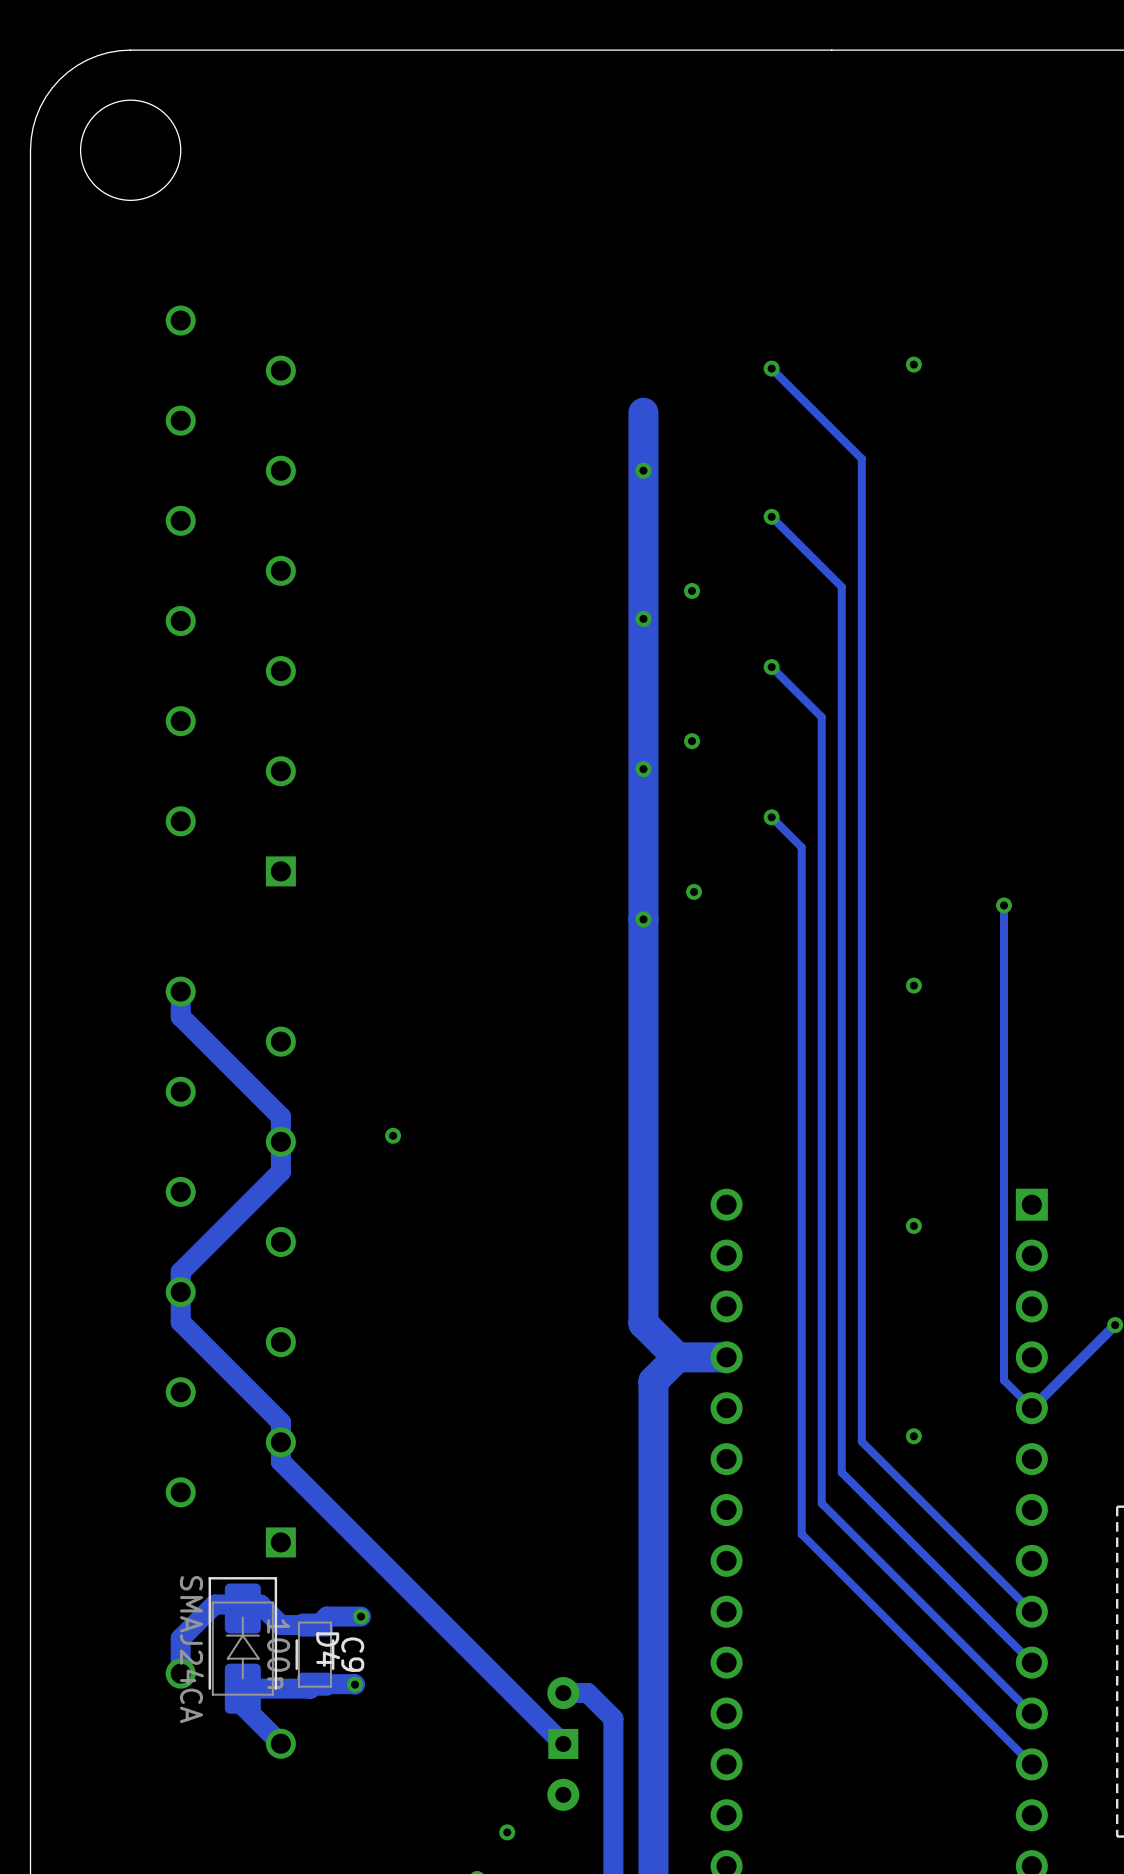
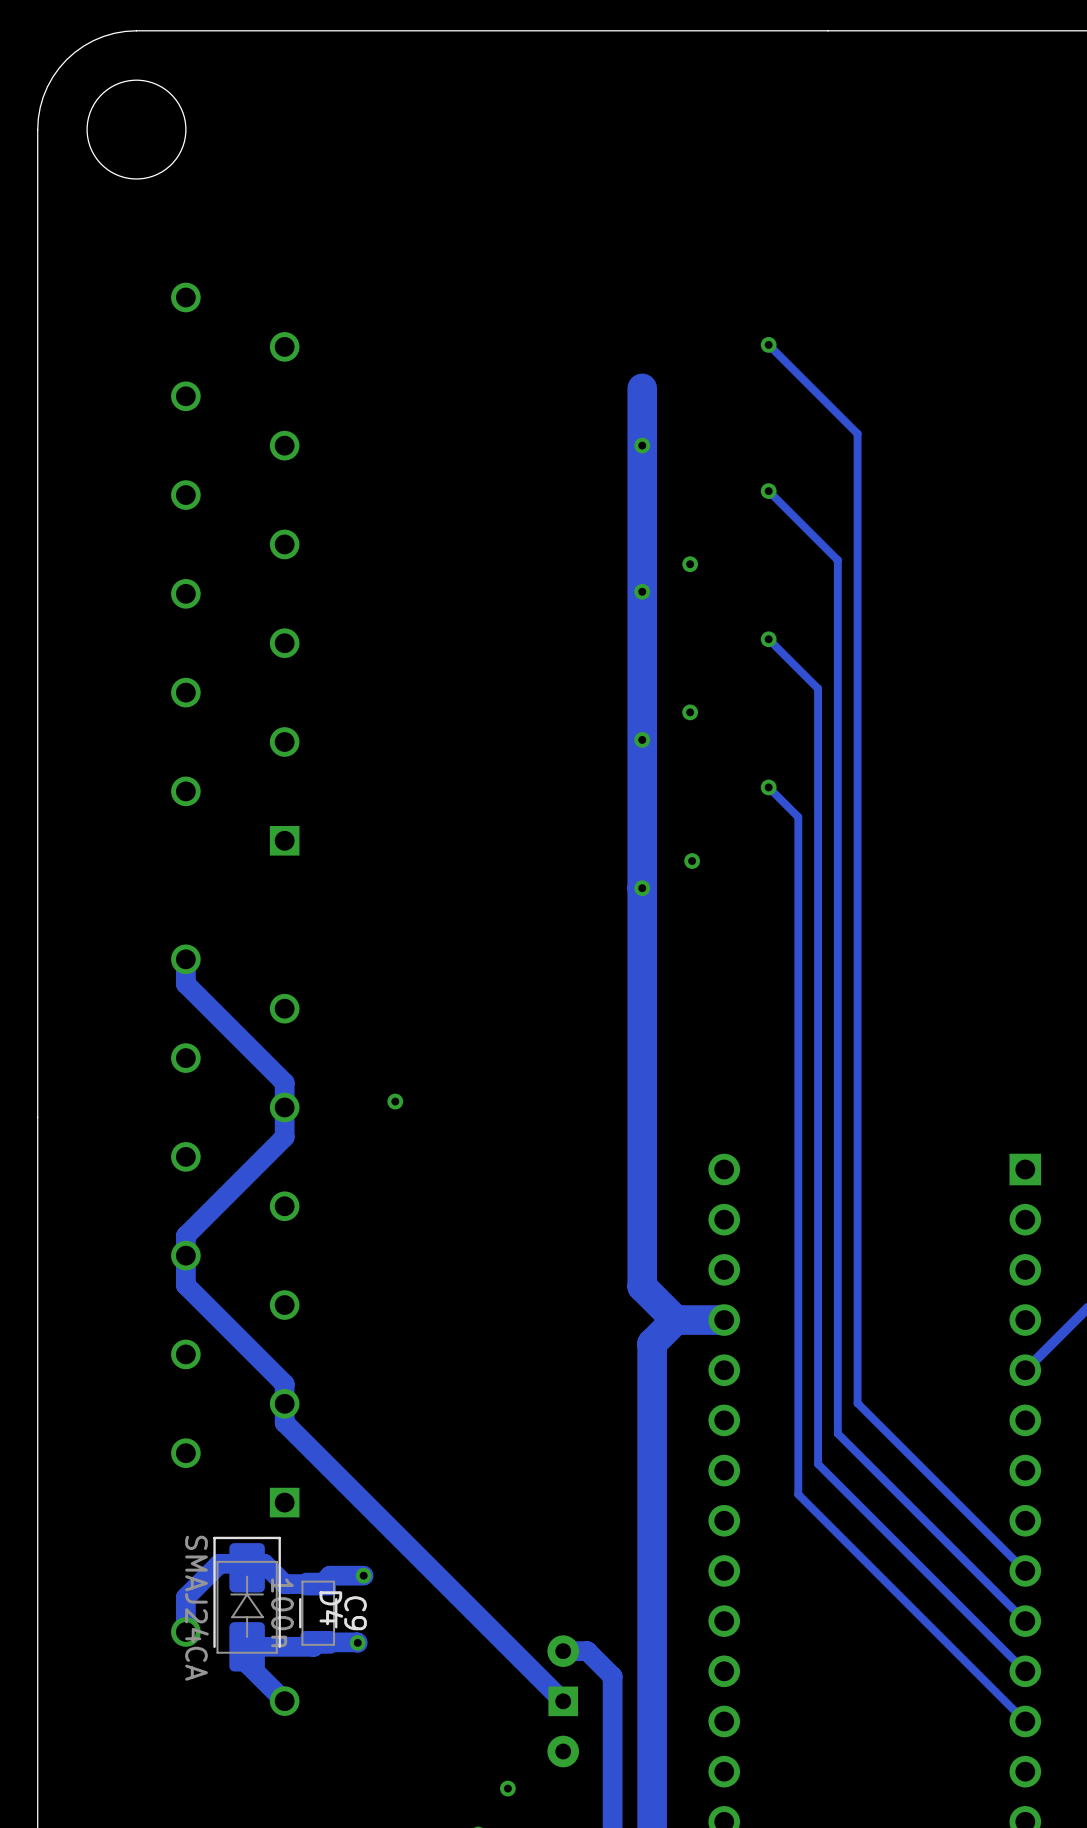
via: (913, 364) -> none
track: (1004, 905) (1004, 1380) (1031, 1408) -> none
via: (1004, 905) -> none
via: (913, 985) -> none
via: (913, 1225) -> none
via: (913, 1436) -> none

